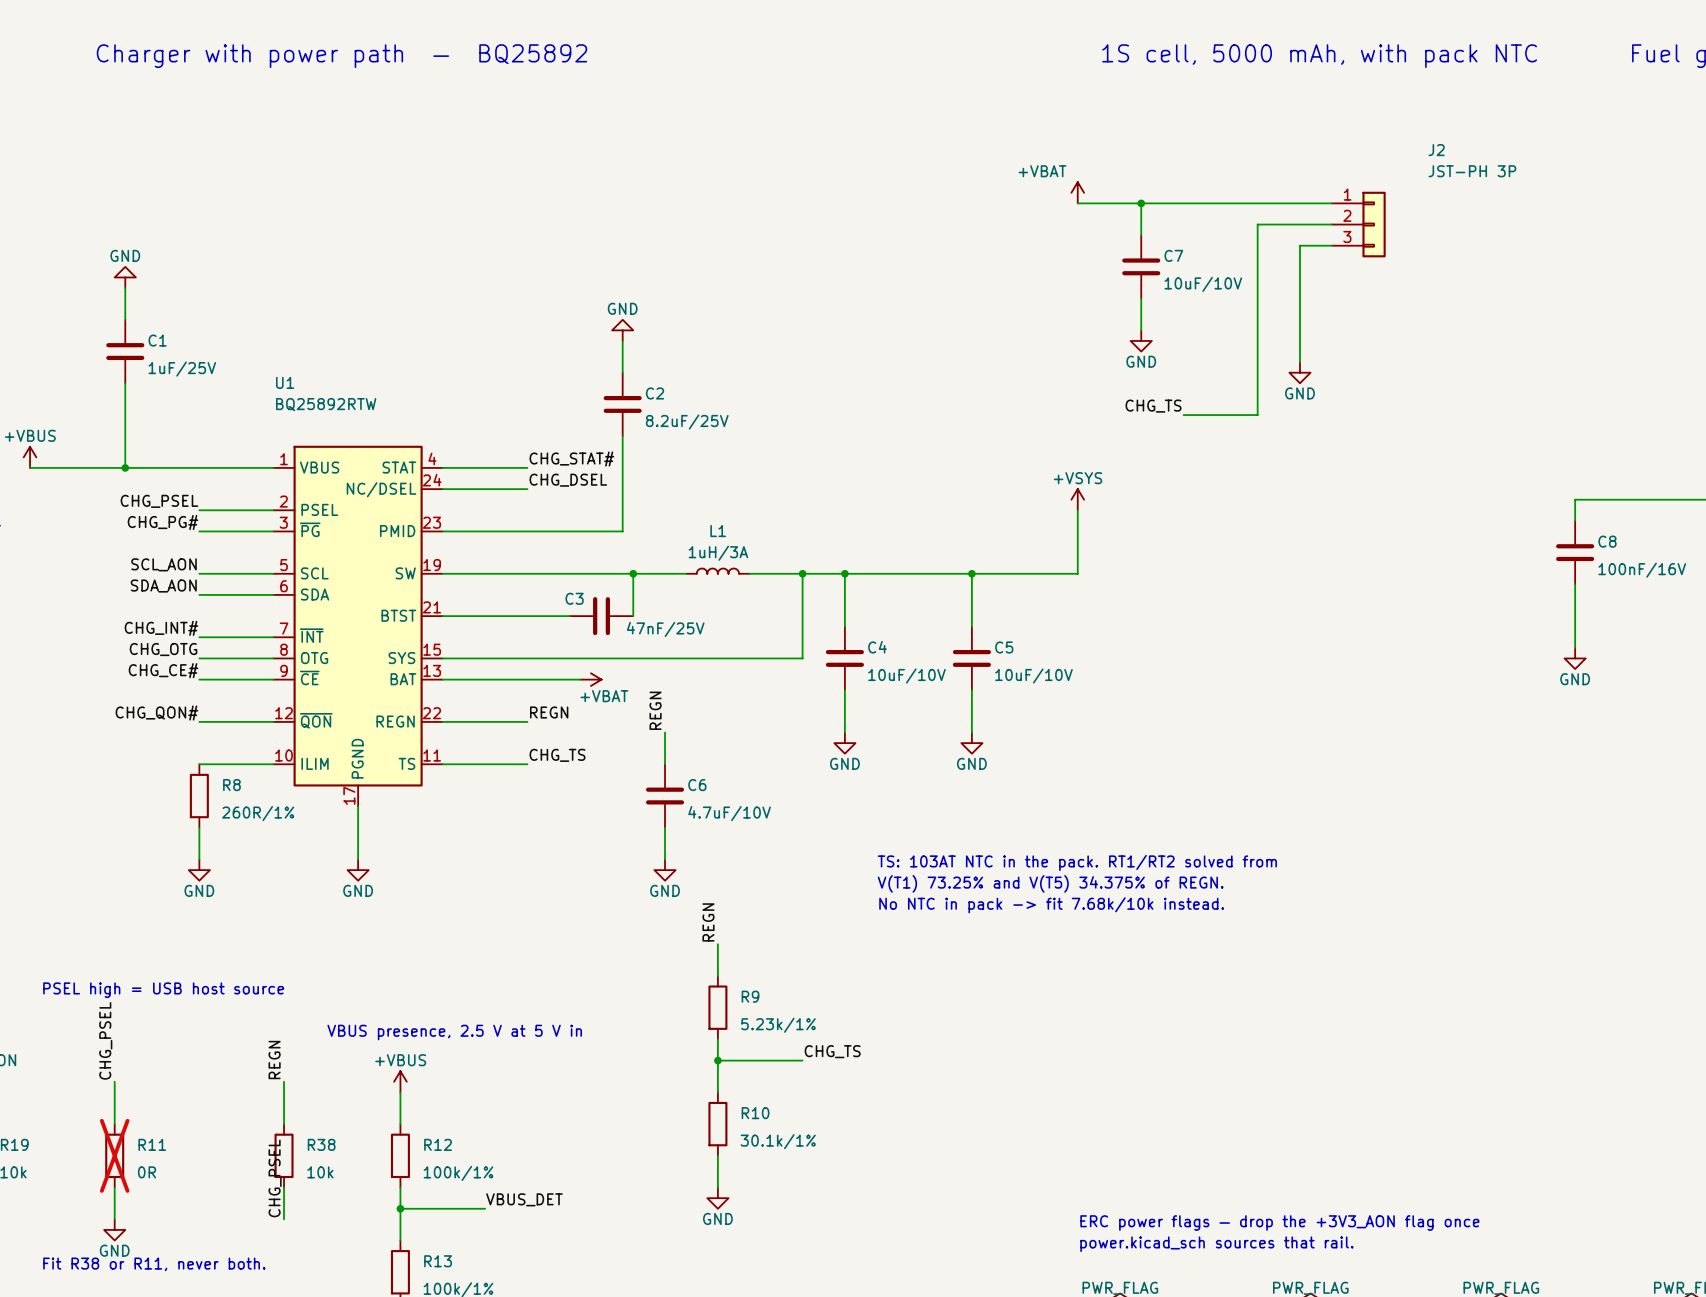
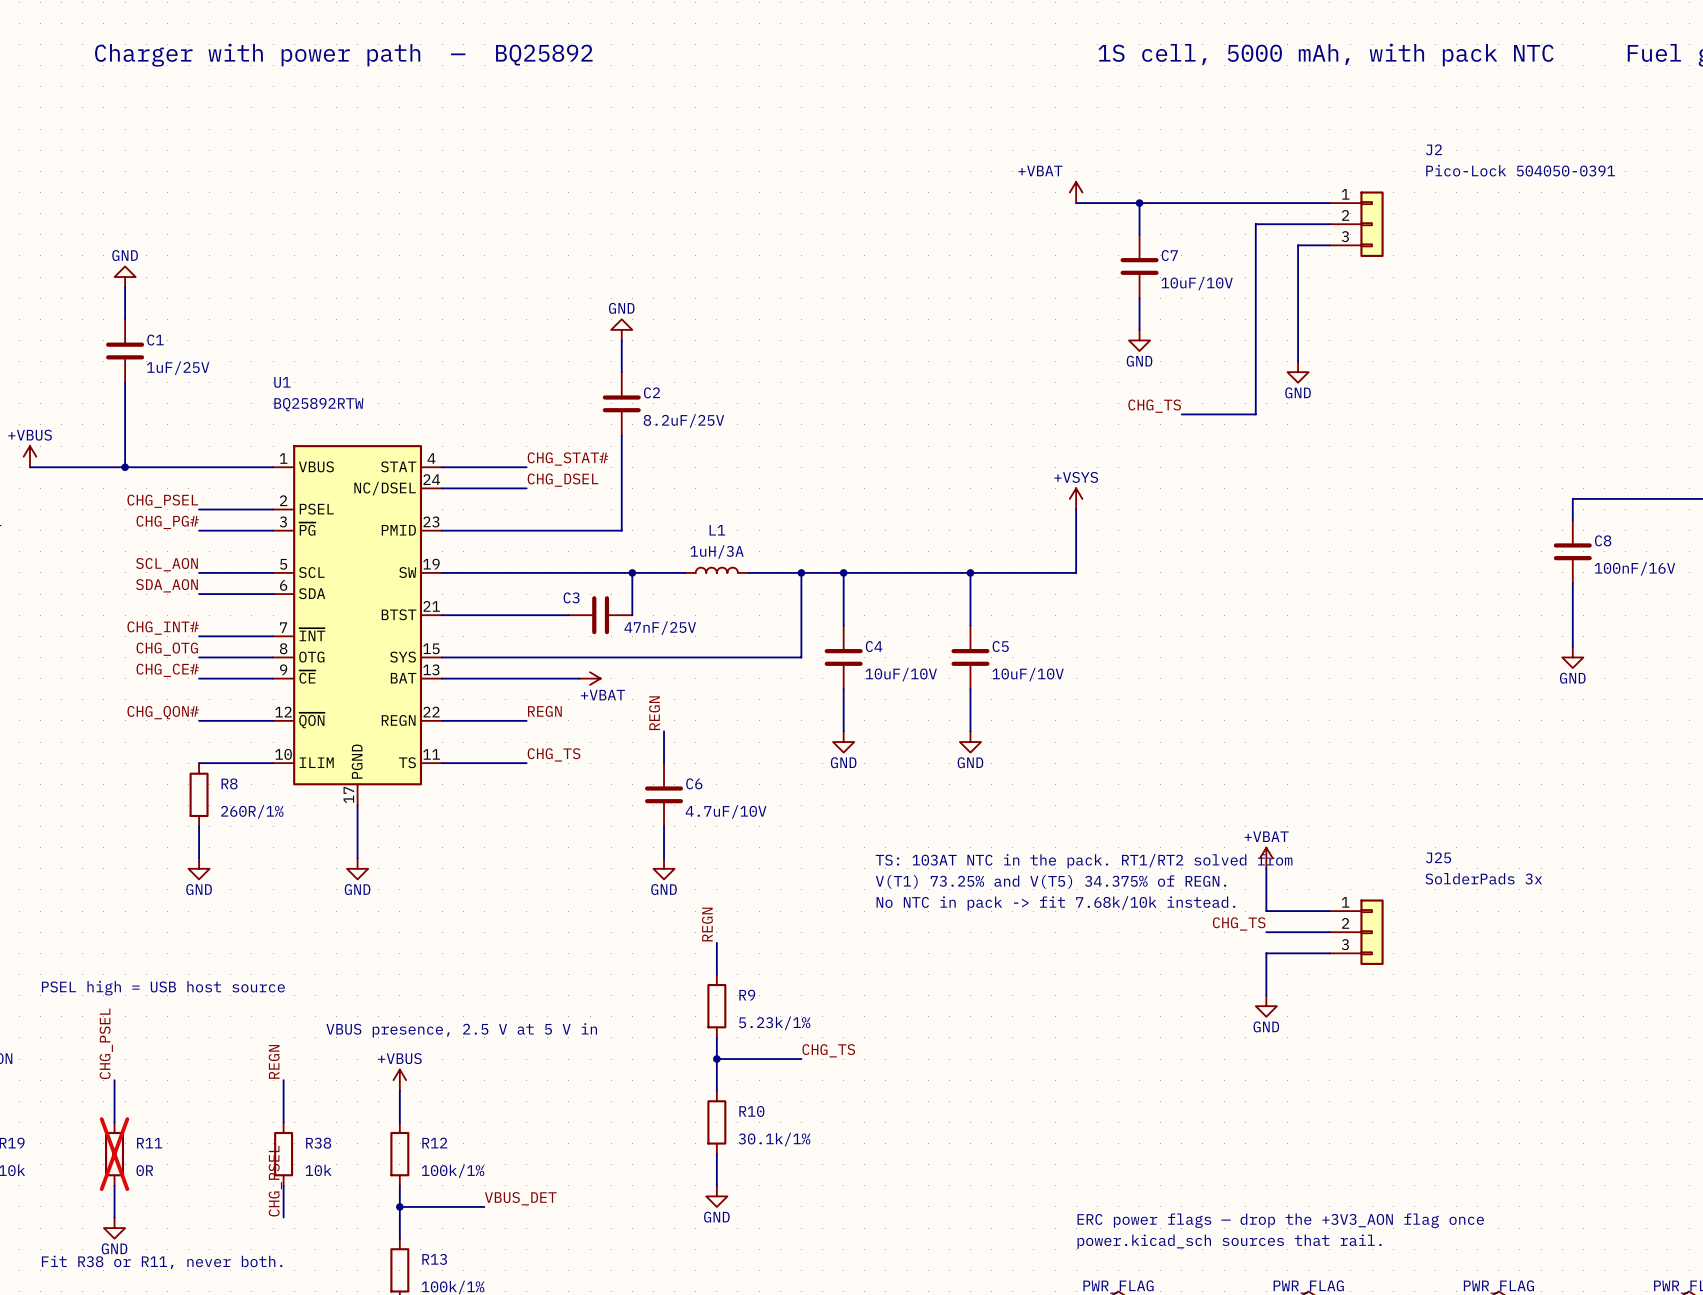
J2 value: JST-PH 3P (1472, 171) -> Pico-Lock 504050-0391 (1520, 170)
power symbol: none -> +VBAT (1266, 858)
wire: none -> (1266, 868) (1266, 911) (1329, 911)
label: none -> CHG_TS (1239, 923)
wire: none -> (1266, 932) (1329, 932)
J25: none -> SolderPads 3x (1356, 932)
wire: none -> (1329, 953) (1266, 953) (1266, 995)
power symbol: none -> GND (1266, 1006)

